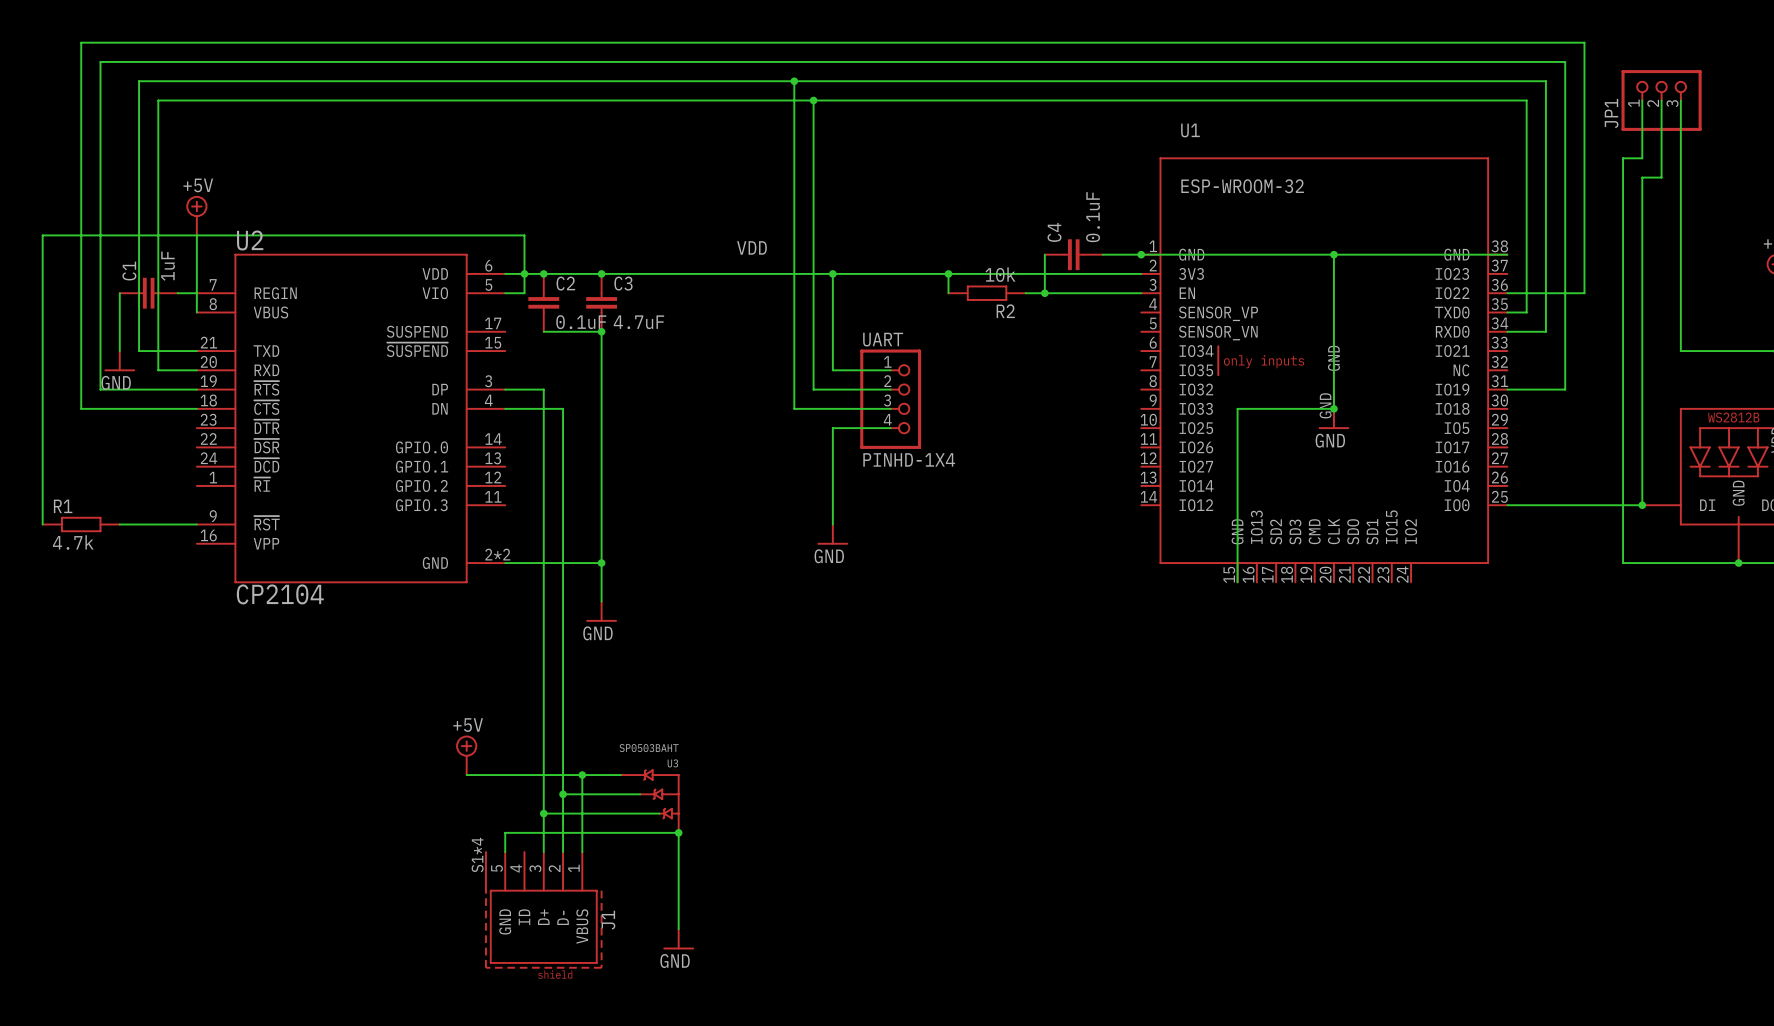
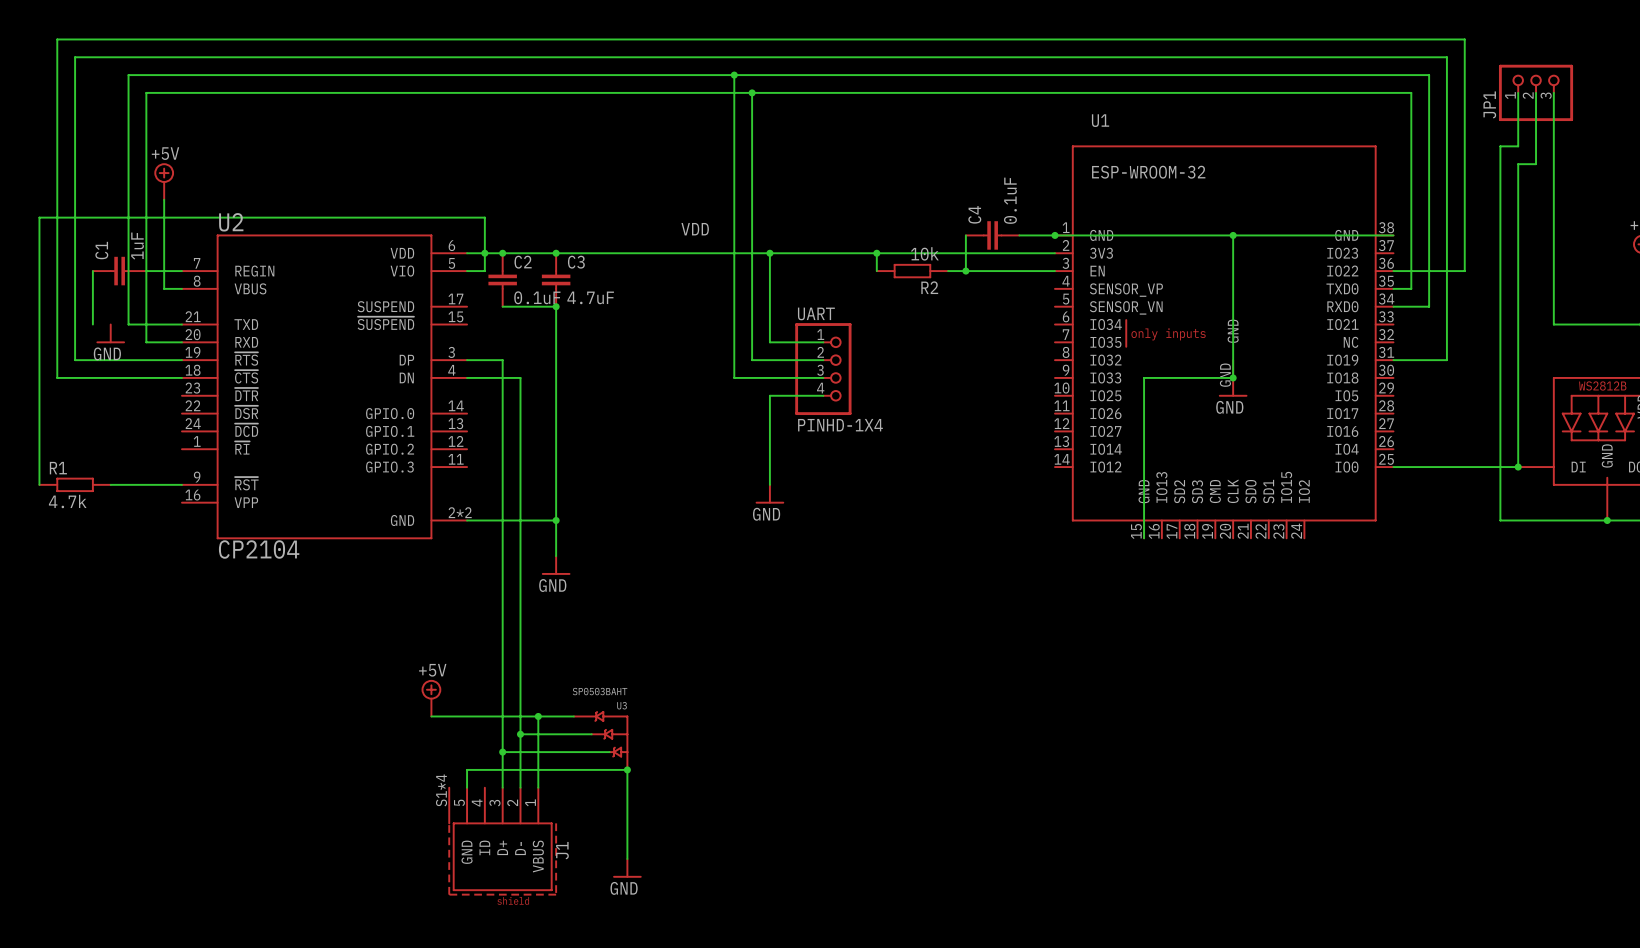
wire: (81, 42) (81, 61) -> (92, 57) (75, 57)
wire: none -> (75, 39) (57, 39) (57, 377) (75, 377)
wire: (100, 61) (100, 293) -> none
power symbol position: +5V (196, 215) -> +5V (164, 181)
wire: (196, 235) (196, 312) -> (164, 199) (164, 288) (181, 288)
wire: (119, 293) (119, 351) -> none
C1 position: (148, 293) -> (119, 271)
wire: (100, 351) (100, 389) -> none
wire: (81, 389) (81, 408) -> (75, 360) (92, 360)

